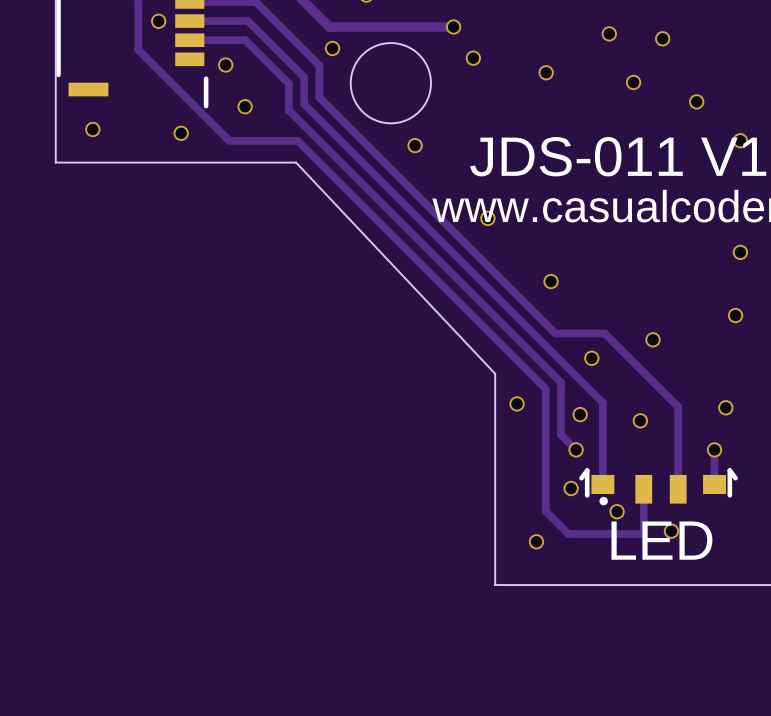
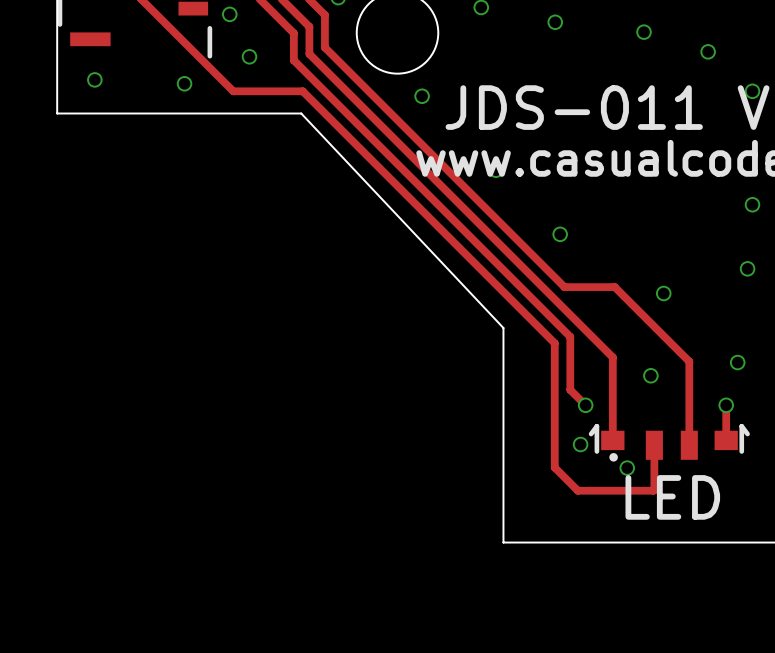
via: (591, 358) -> none
via: (517, 403) -> none
via: (580, 414) -> none
via: (671, 531) -> none
via: (536, 541) -> none

